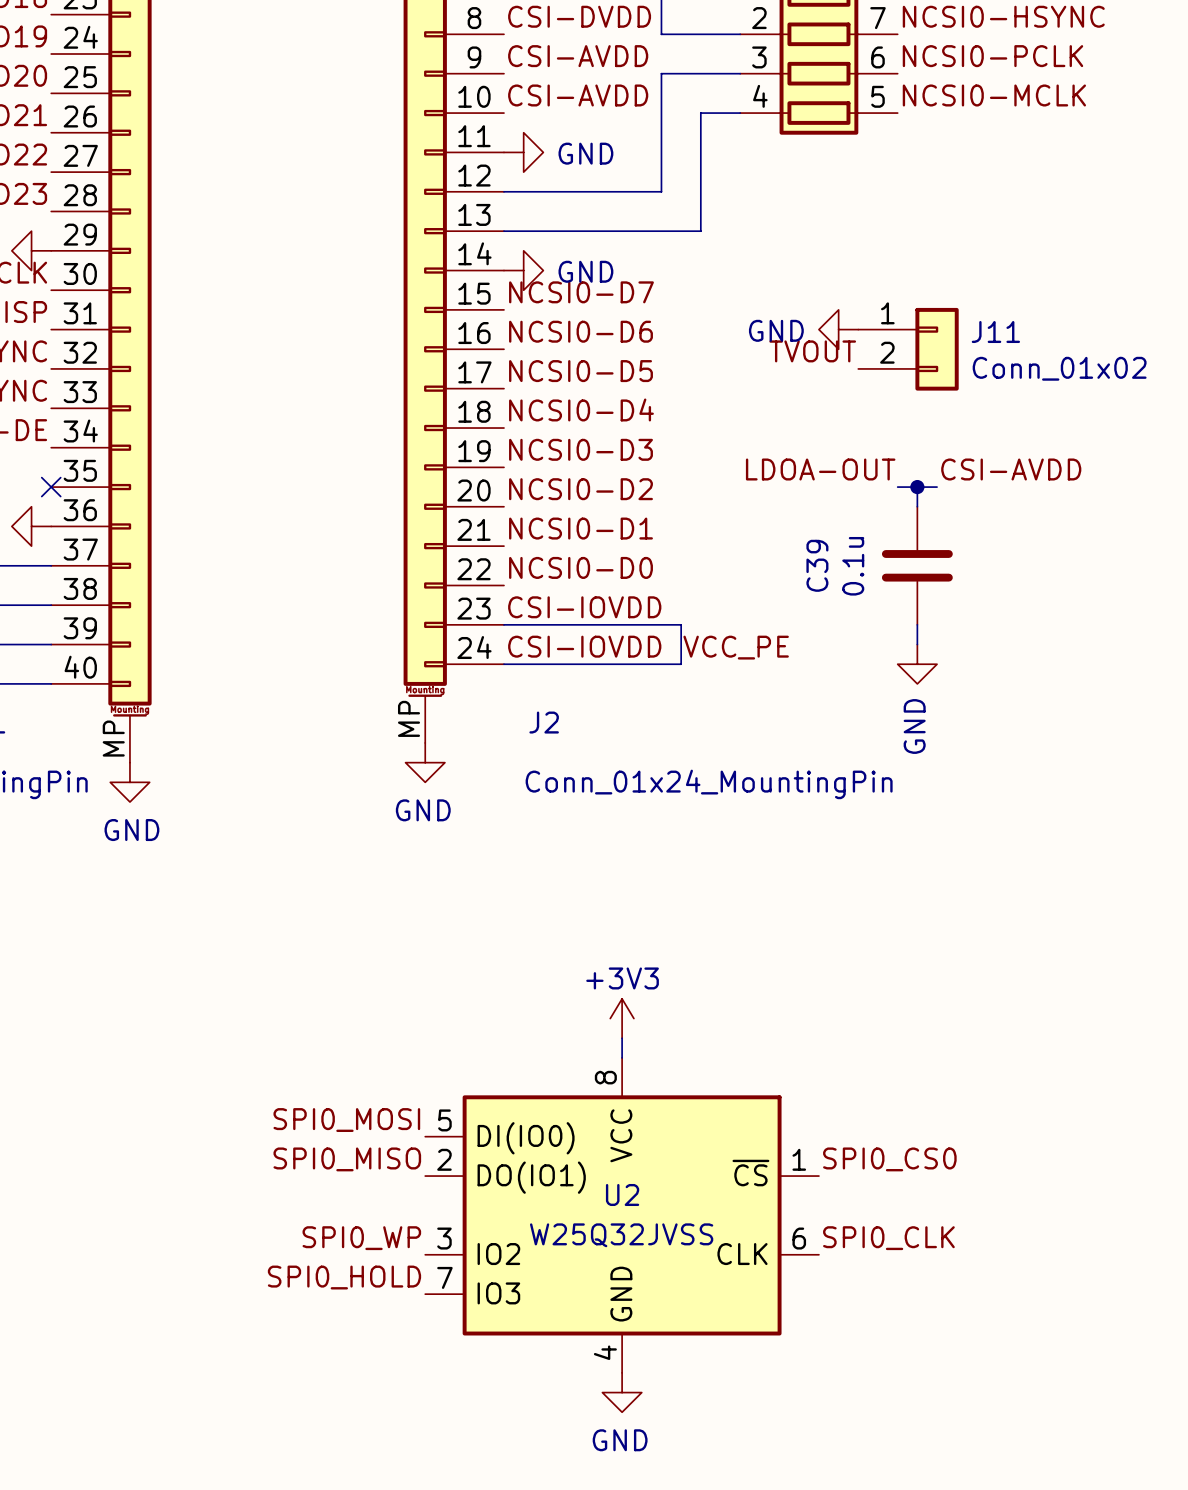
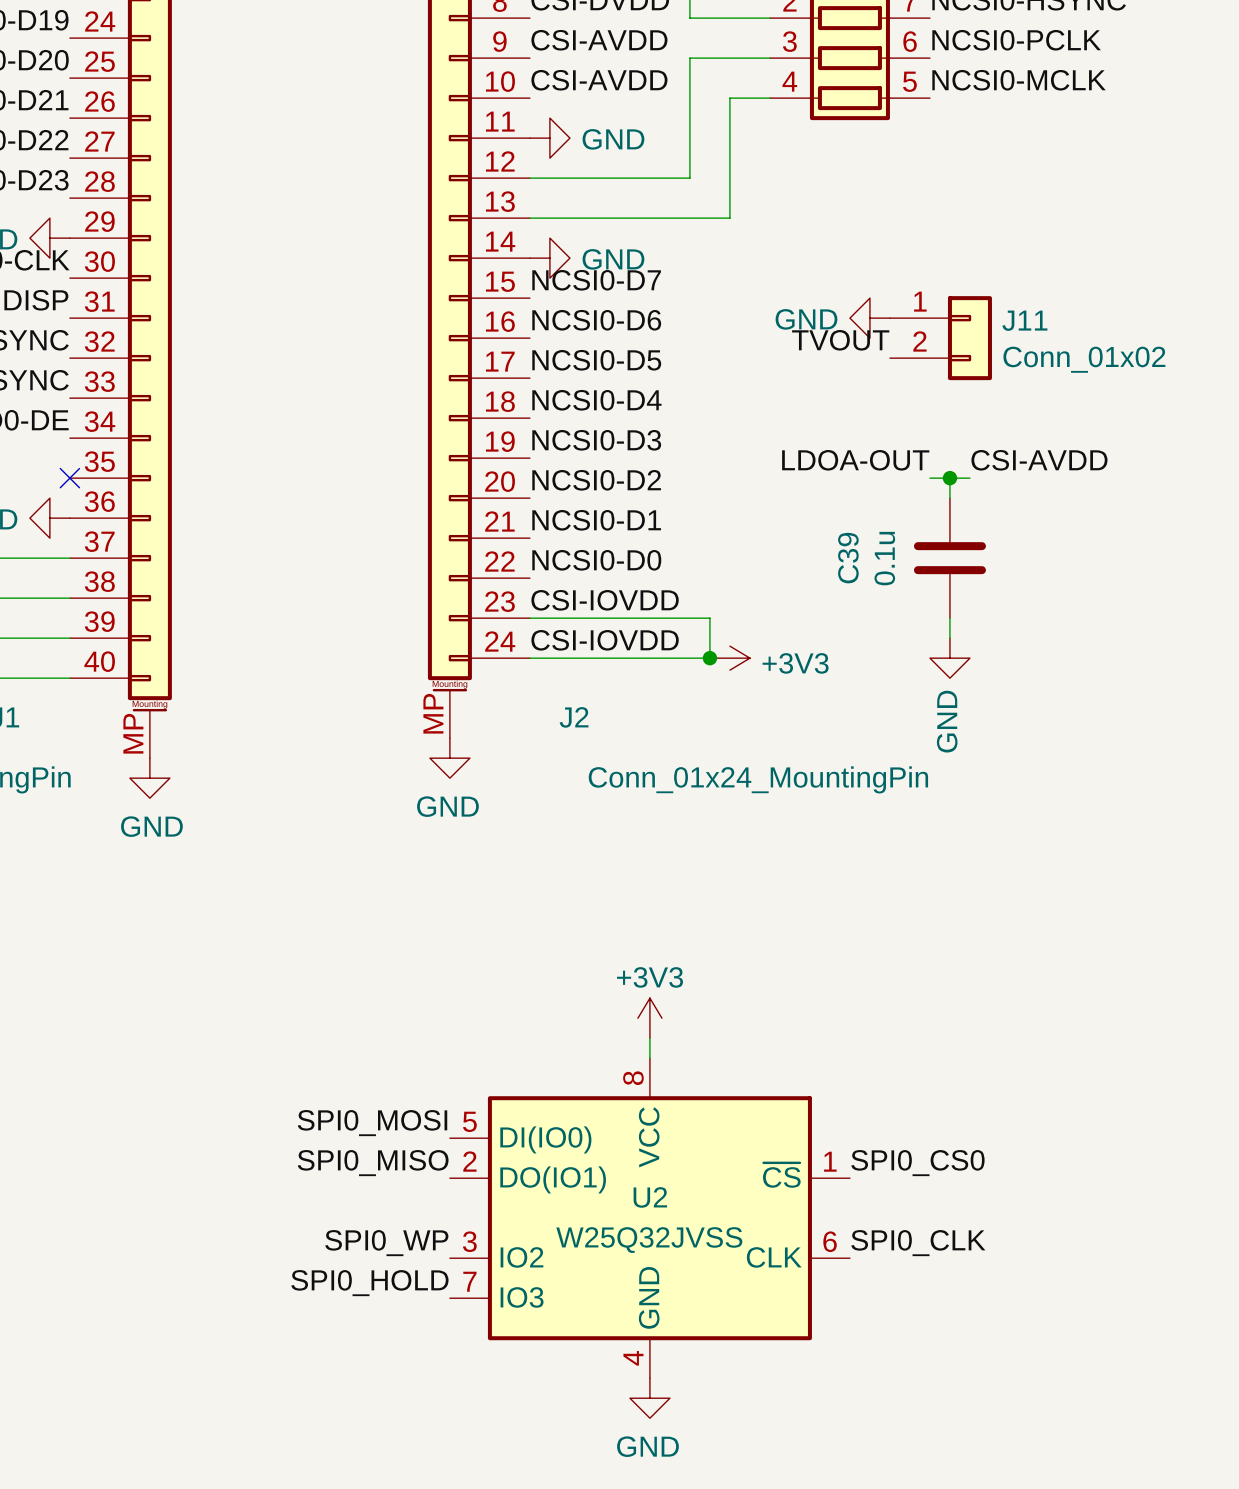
label: VCC_PE (736, 647) -> none
junction: none -> (709, 658)
power symbol: none -> +3V3 (729, 658)

